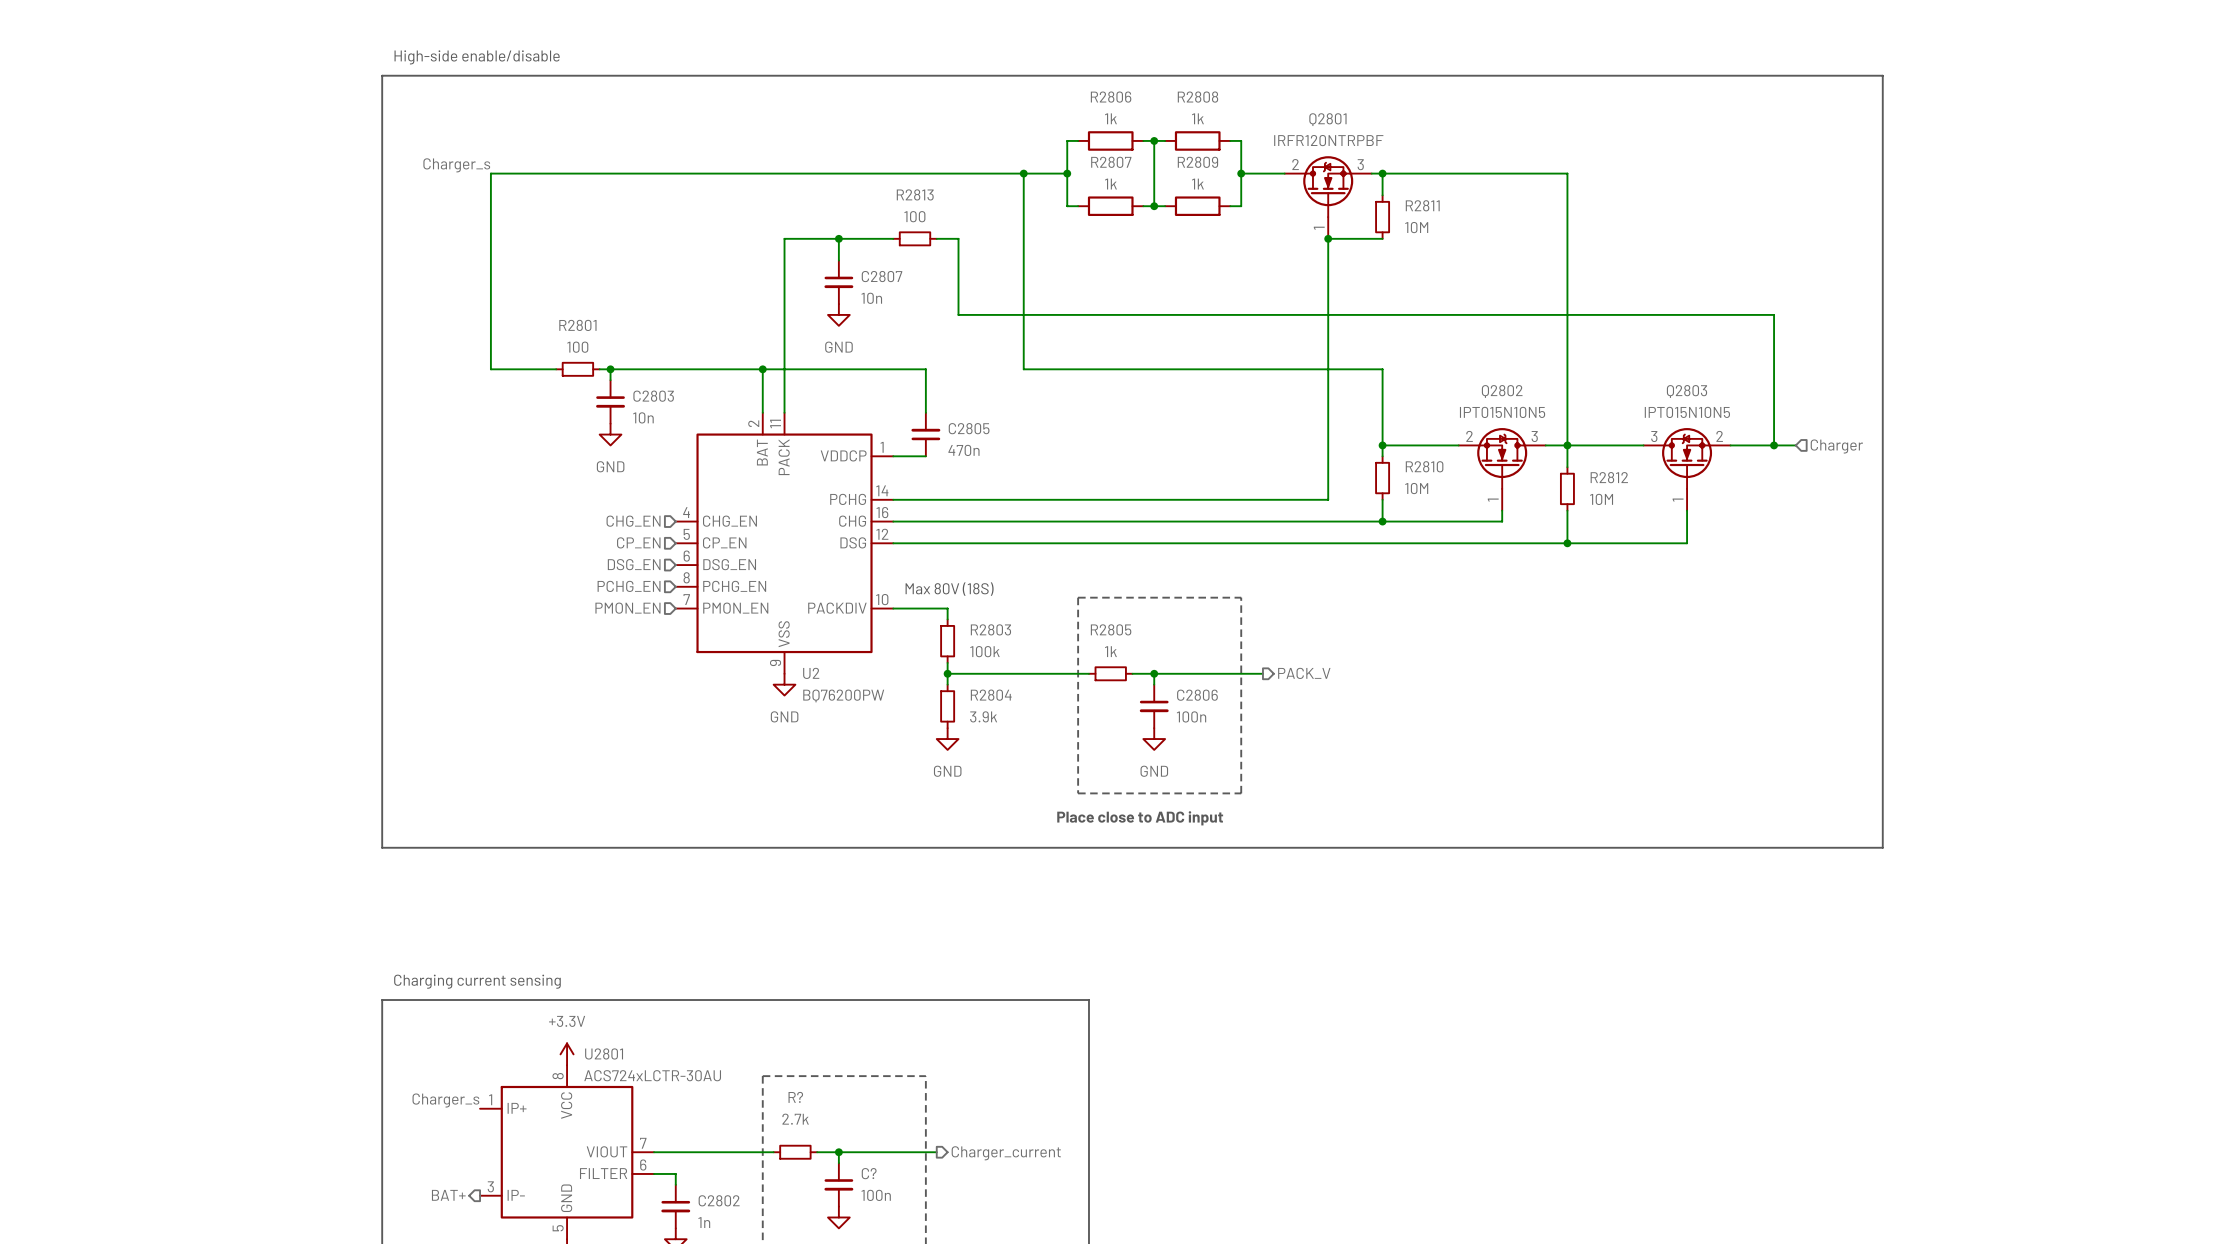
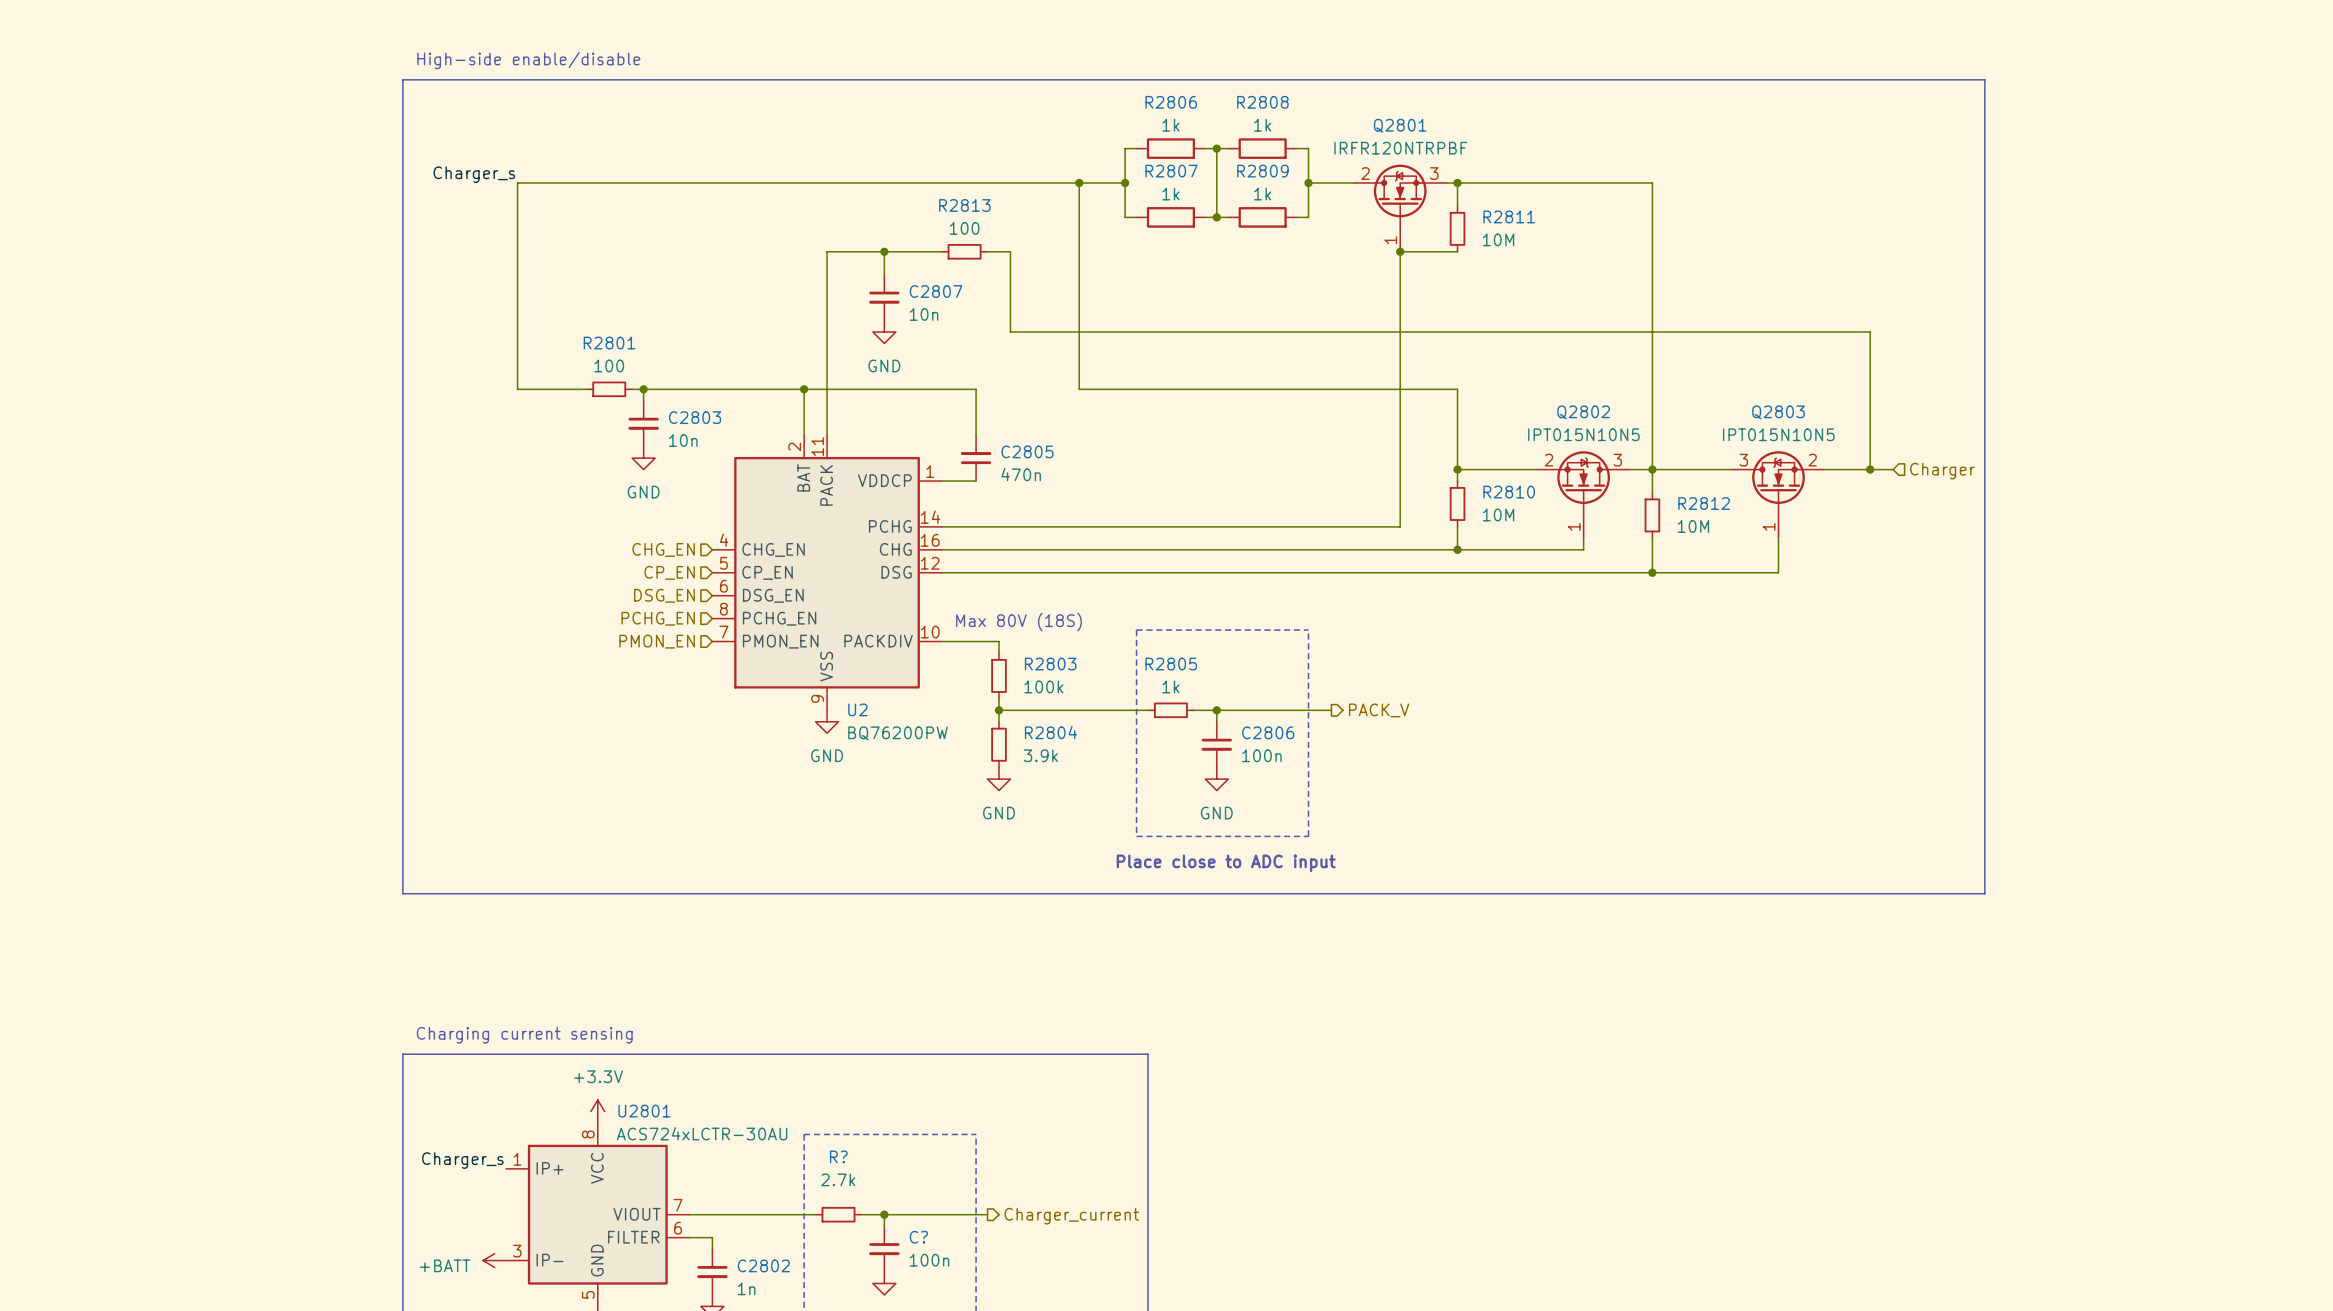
hierarchical label: BAT+ (448, 1195) -> none
power symbol: none -> +BATT (494, 1260)

